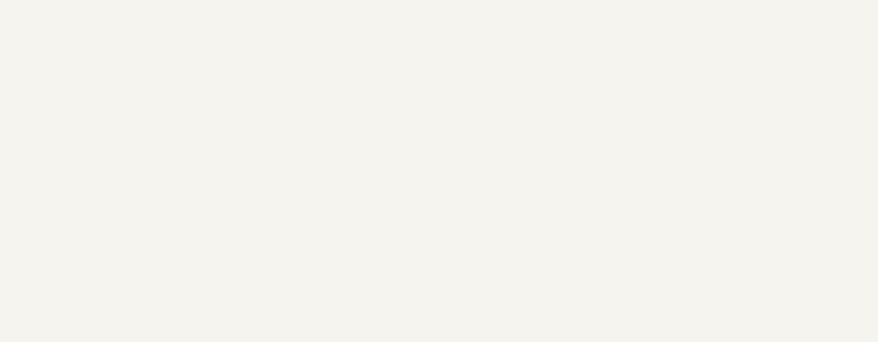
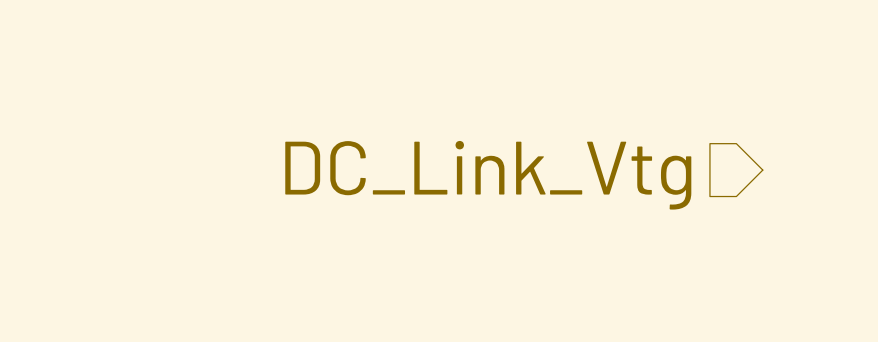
hierarchical label: none -> DC_Link_Vtg (488, 175)

